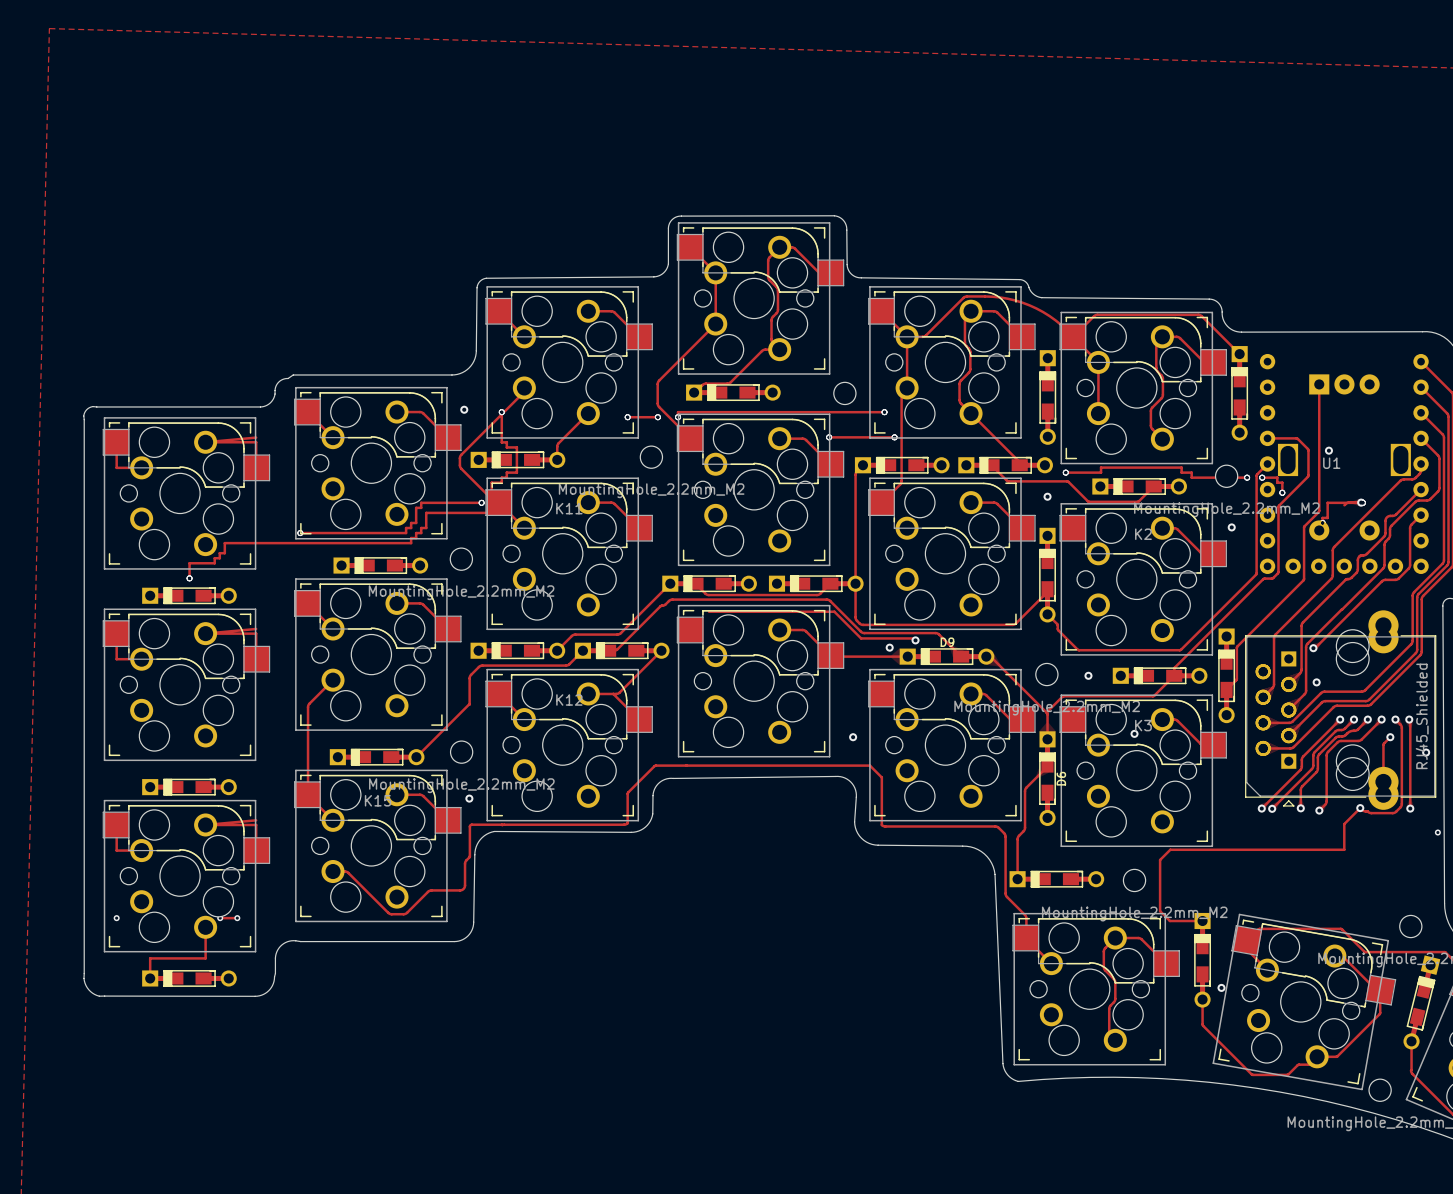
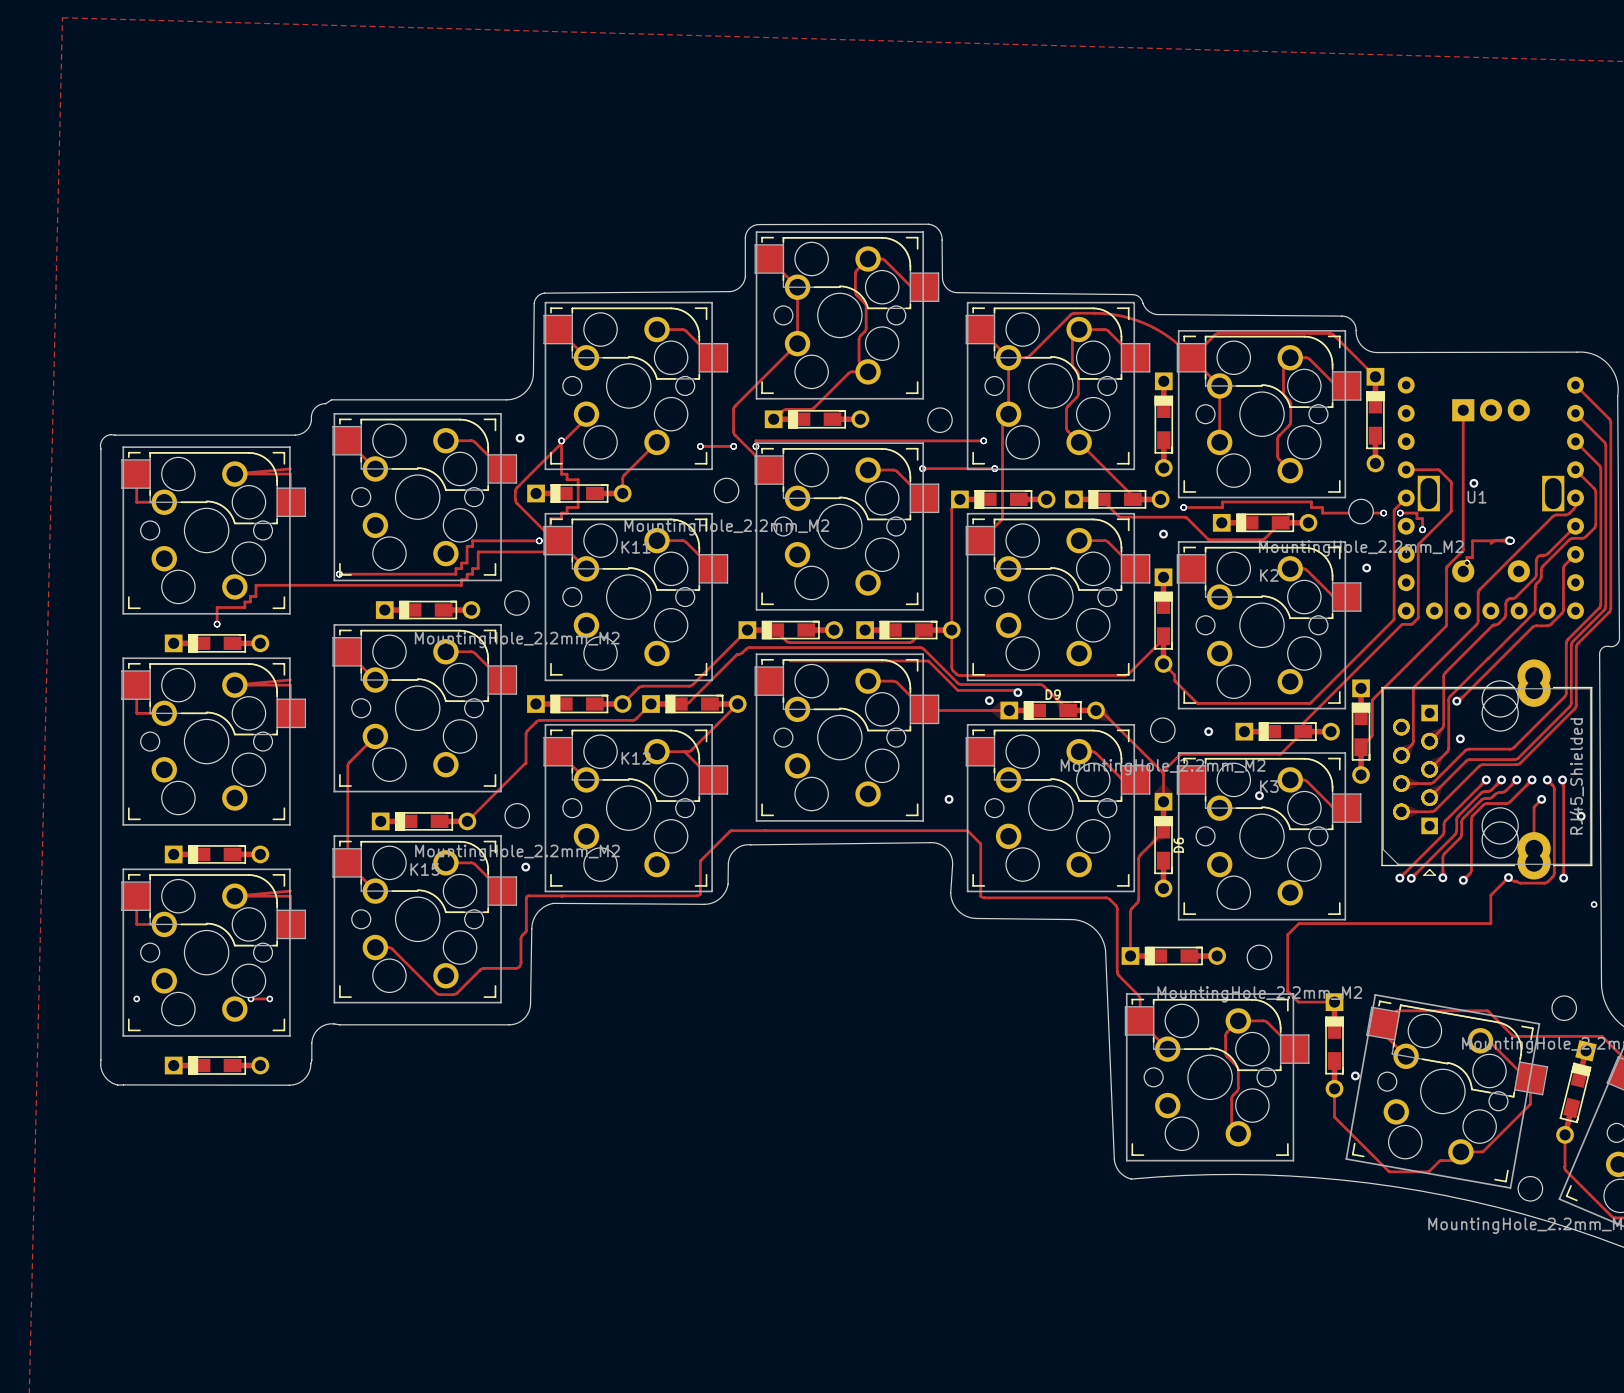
track: (205, 927) (205, 958) (150, 958) (150, 978) -> none

